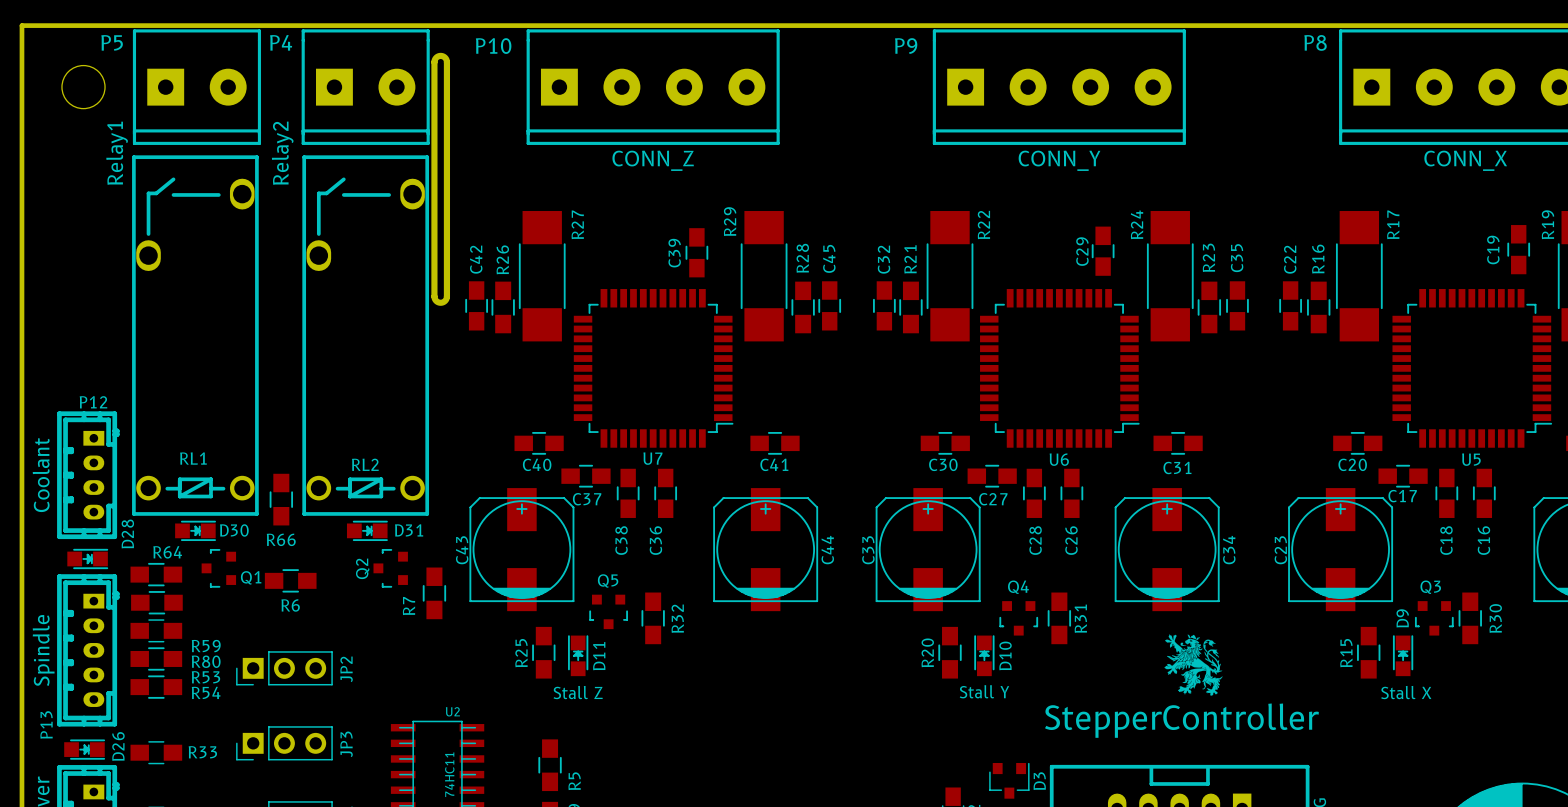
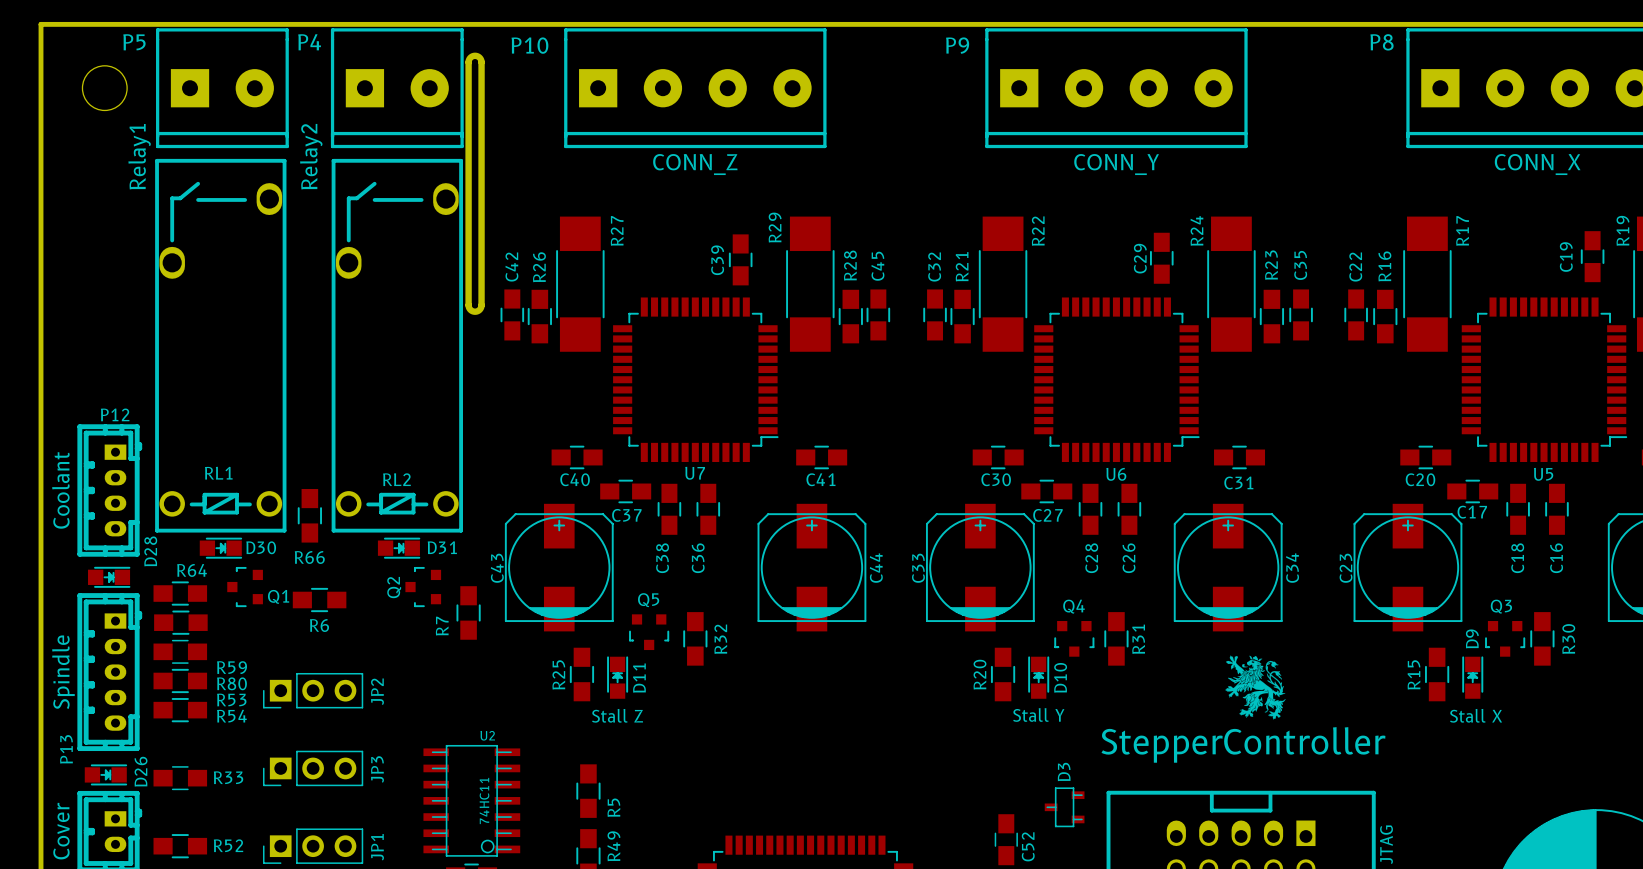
D3 footprint: [989, 762, 1030, 799] -> [1044, 787, 1085, 828]
D3 name position: D3 (1039, 781) -> D3 (1064, 771)

